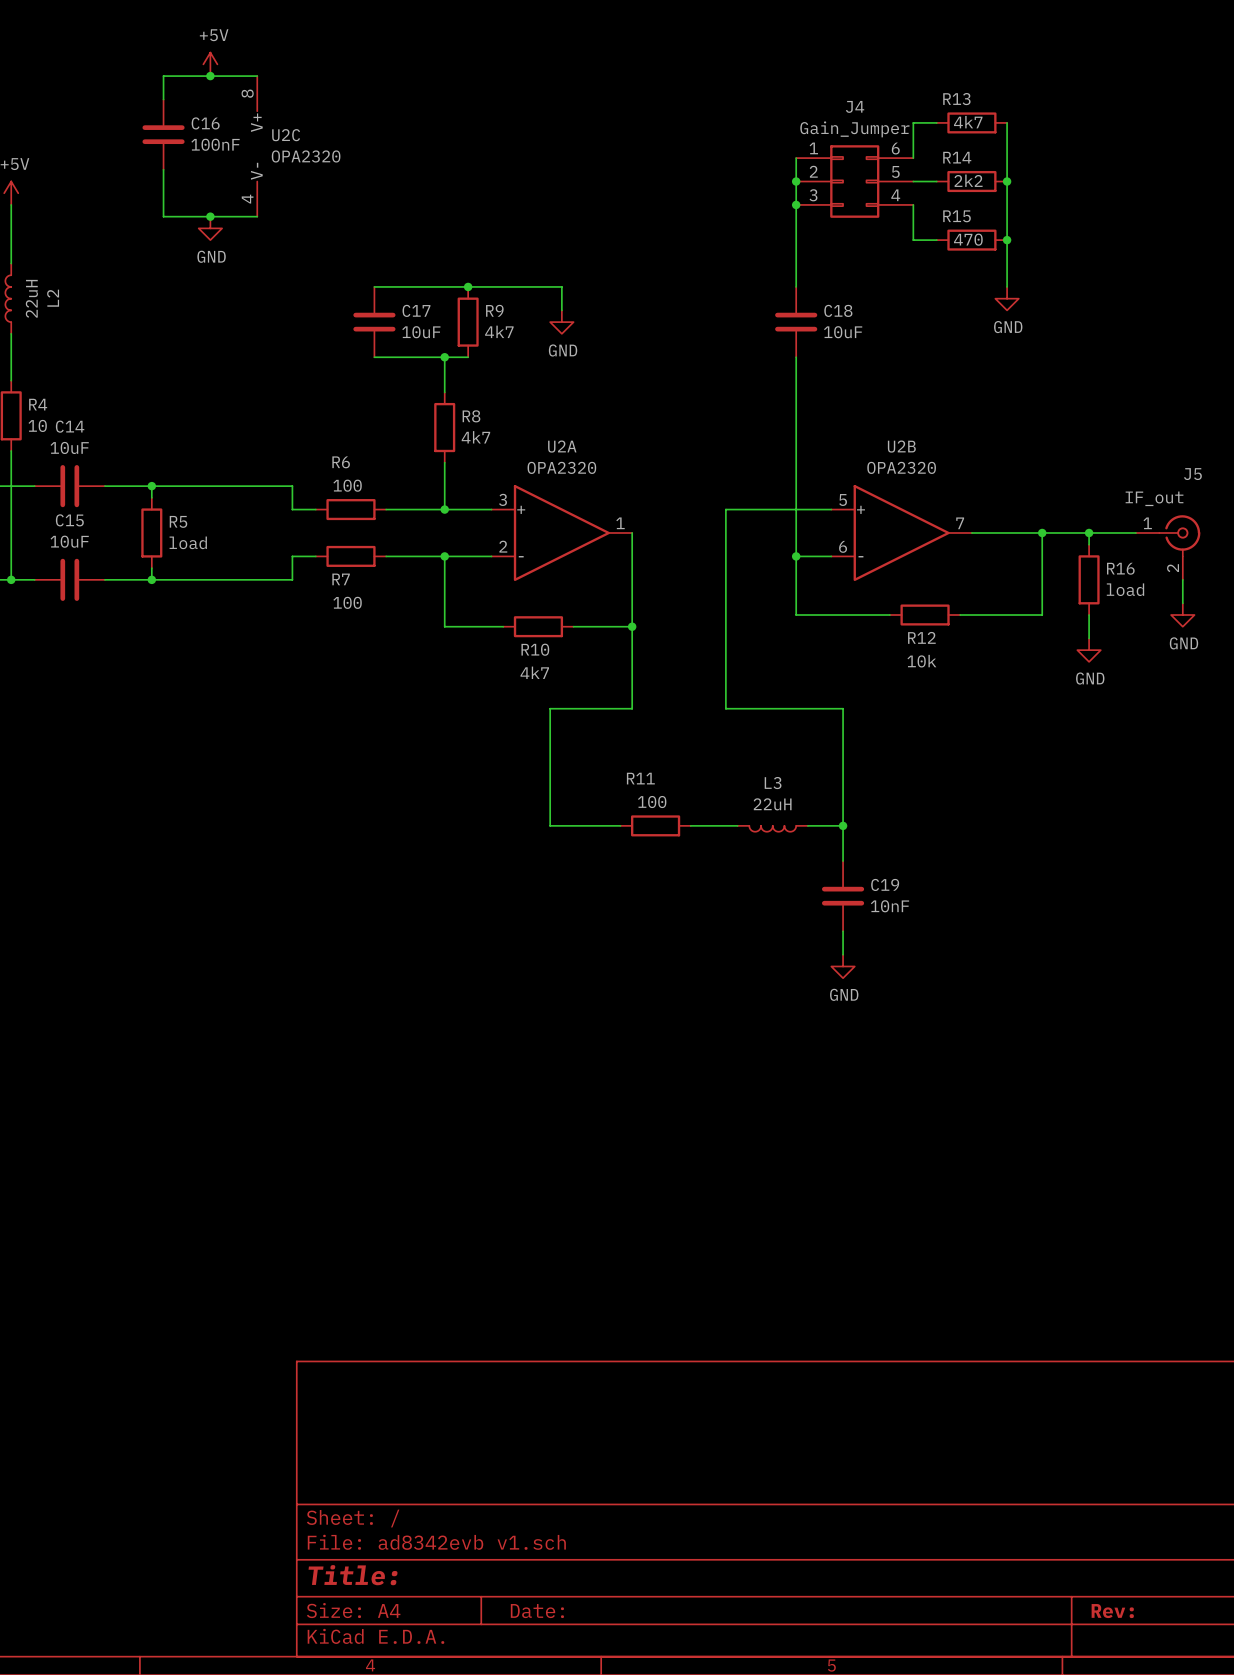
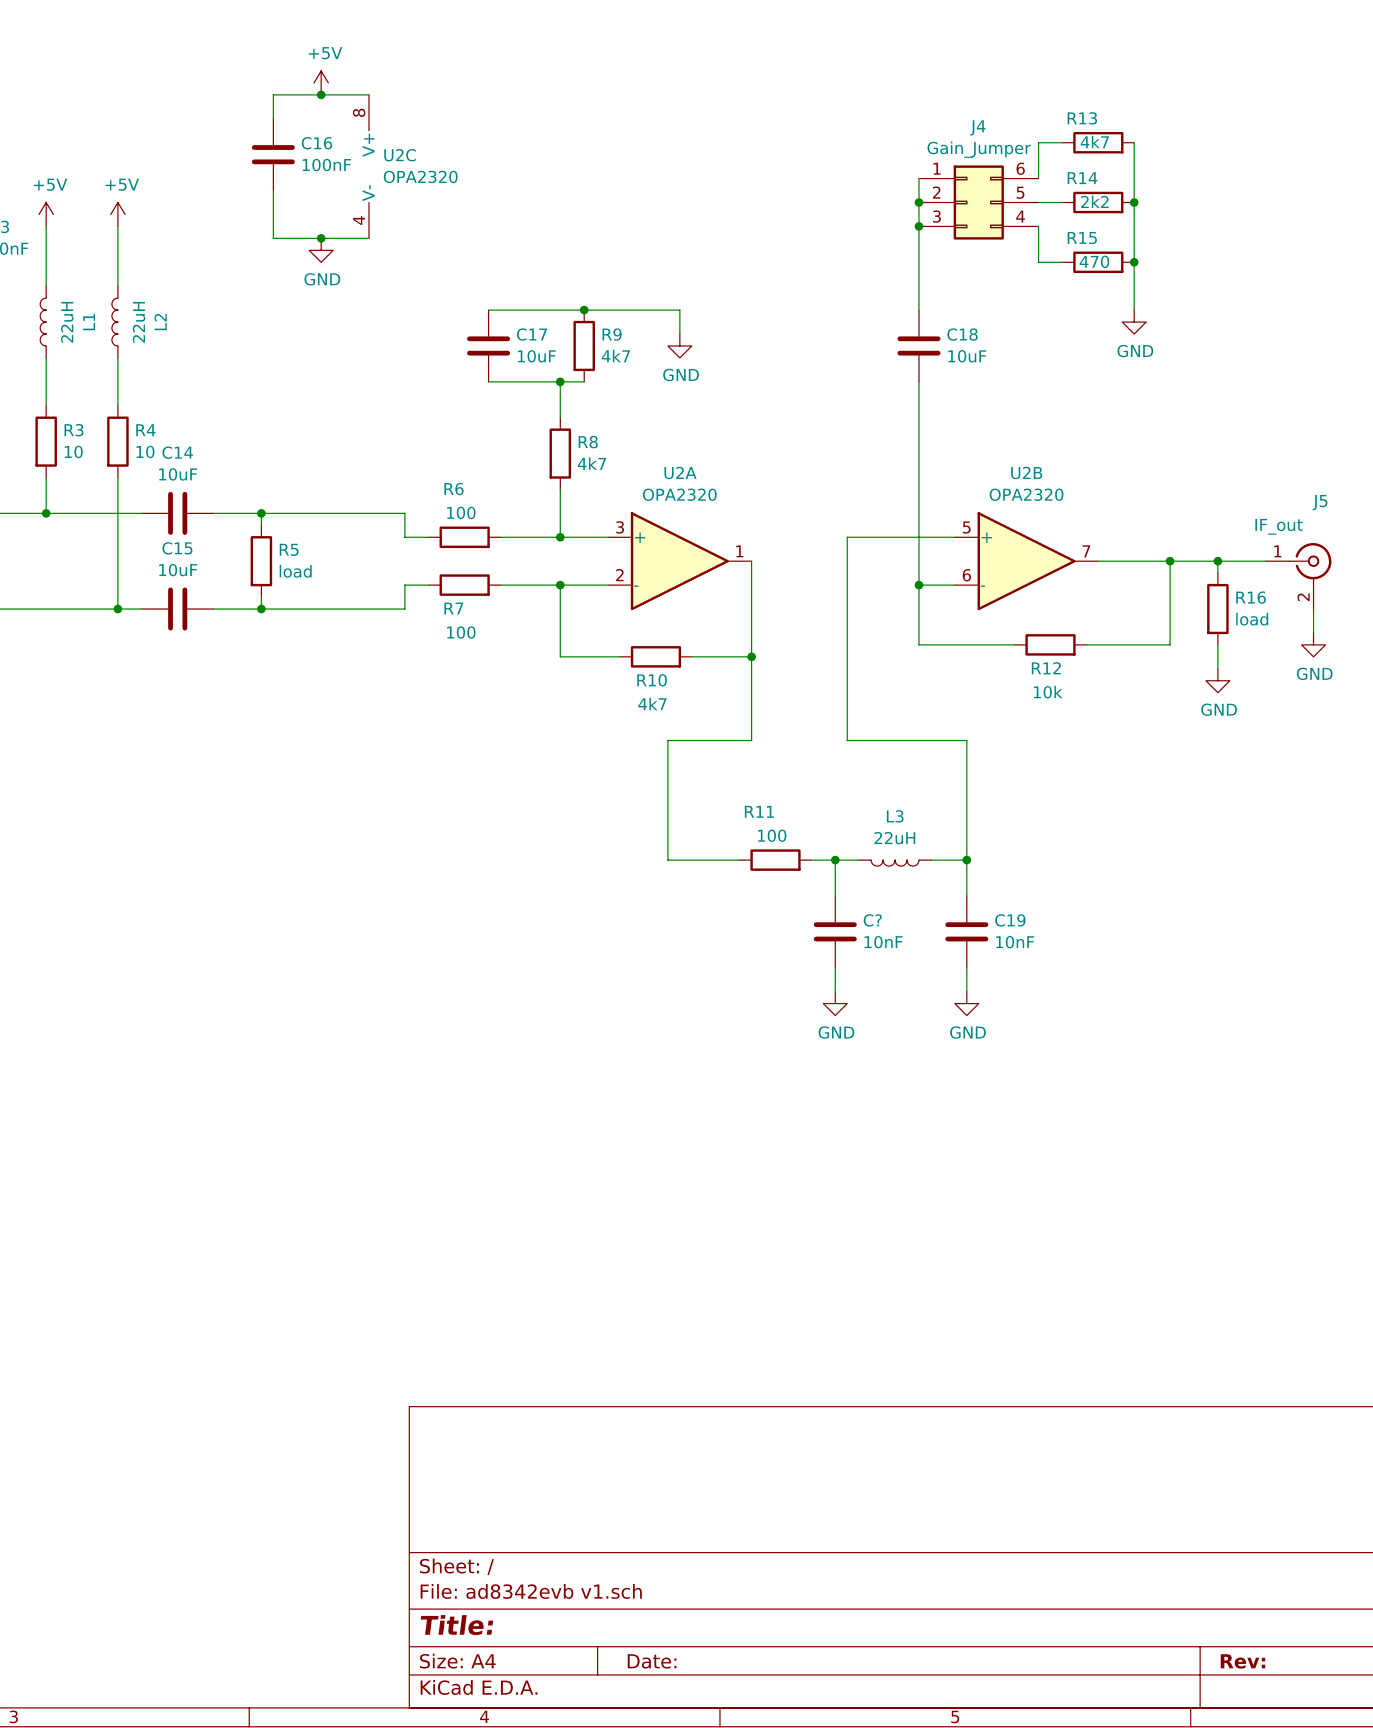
wire: none -> (835, 860) (835, 895)
junction: none -> (835, 860)
C?: none -> 10nF (835, 931)
wire: none -> (835, 967) (835, 991)
power symbol: none -> GND (835, 1003)

